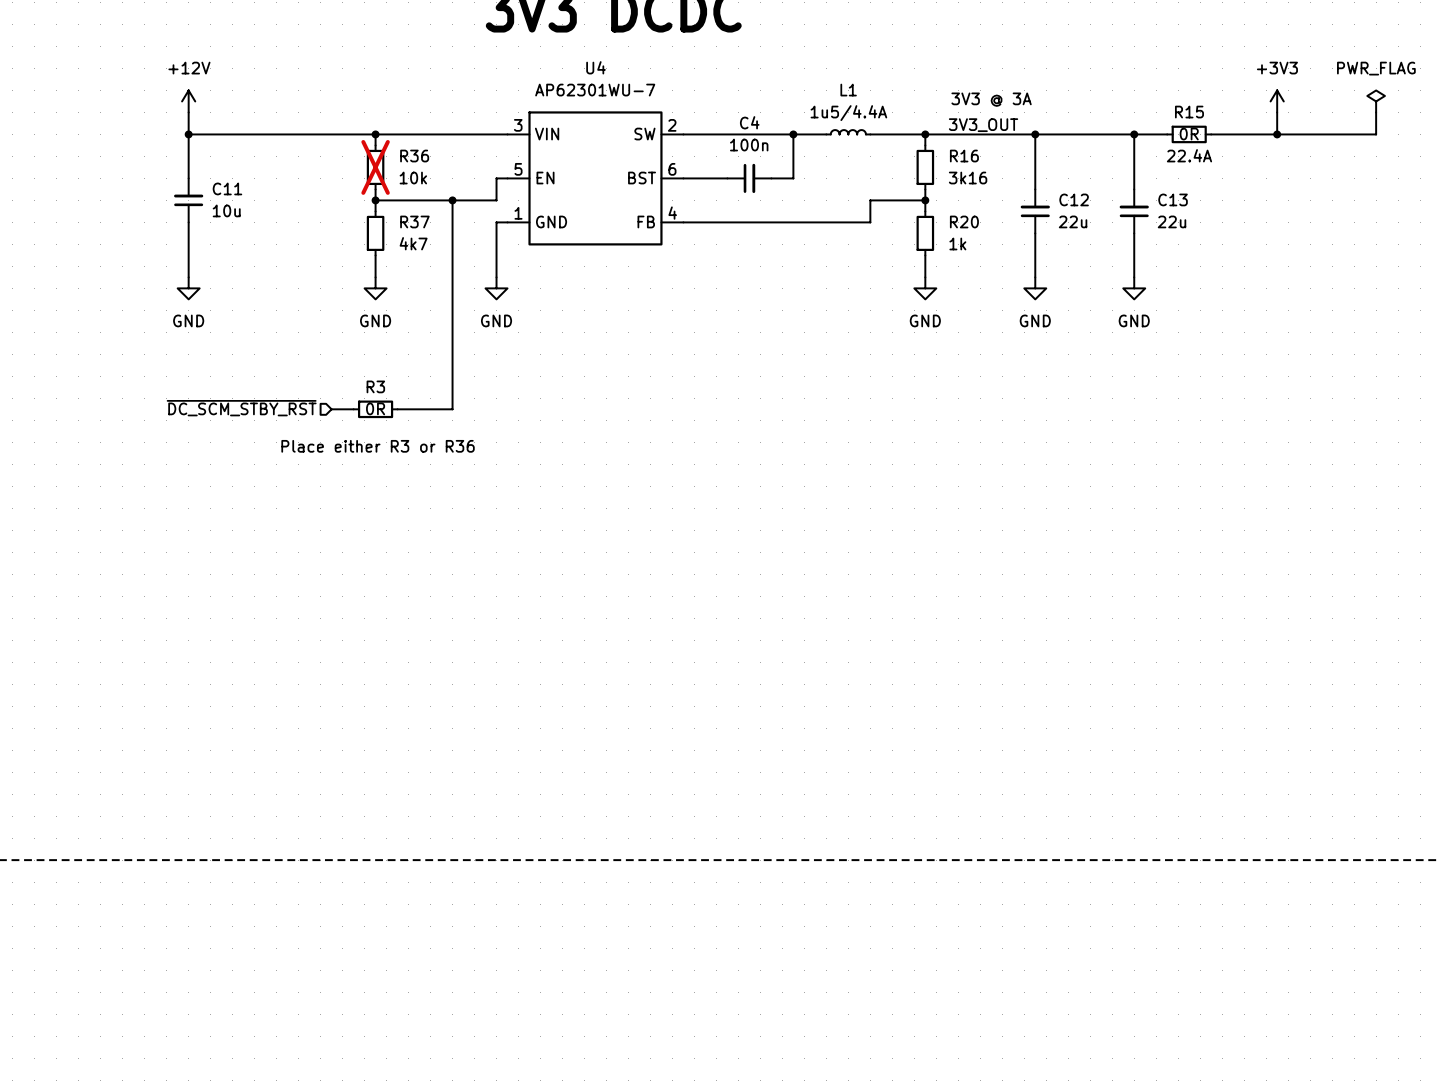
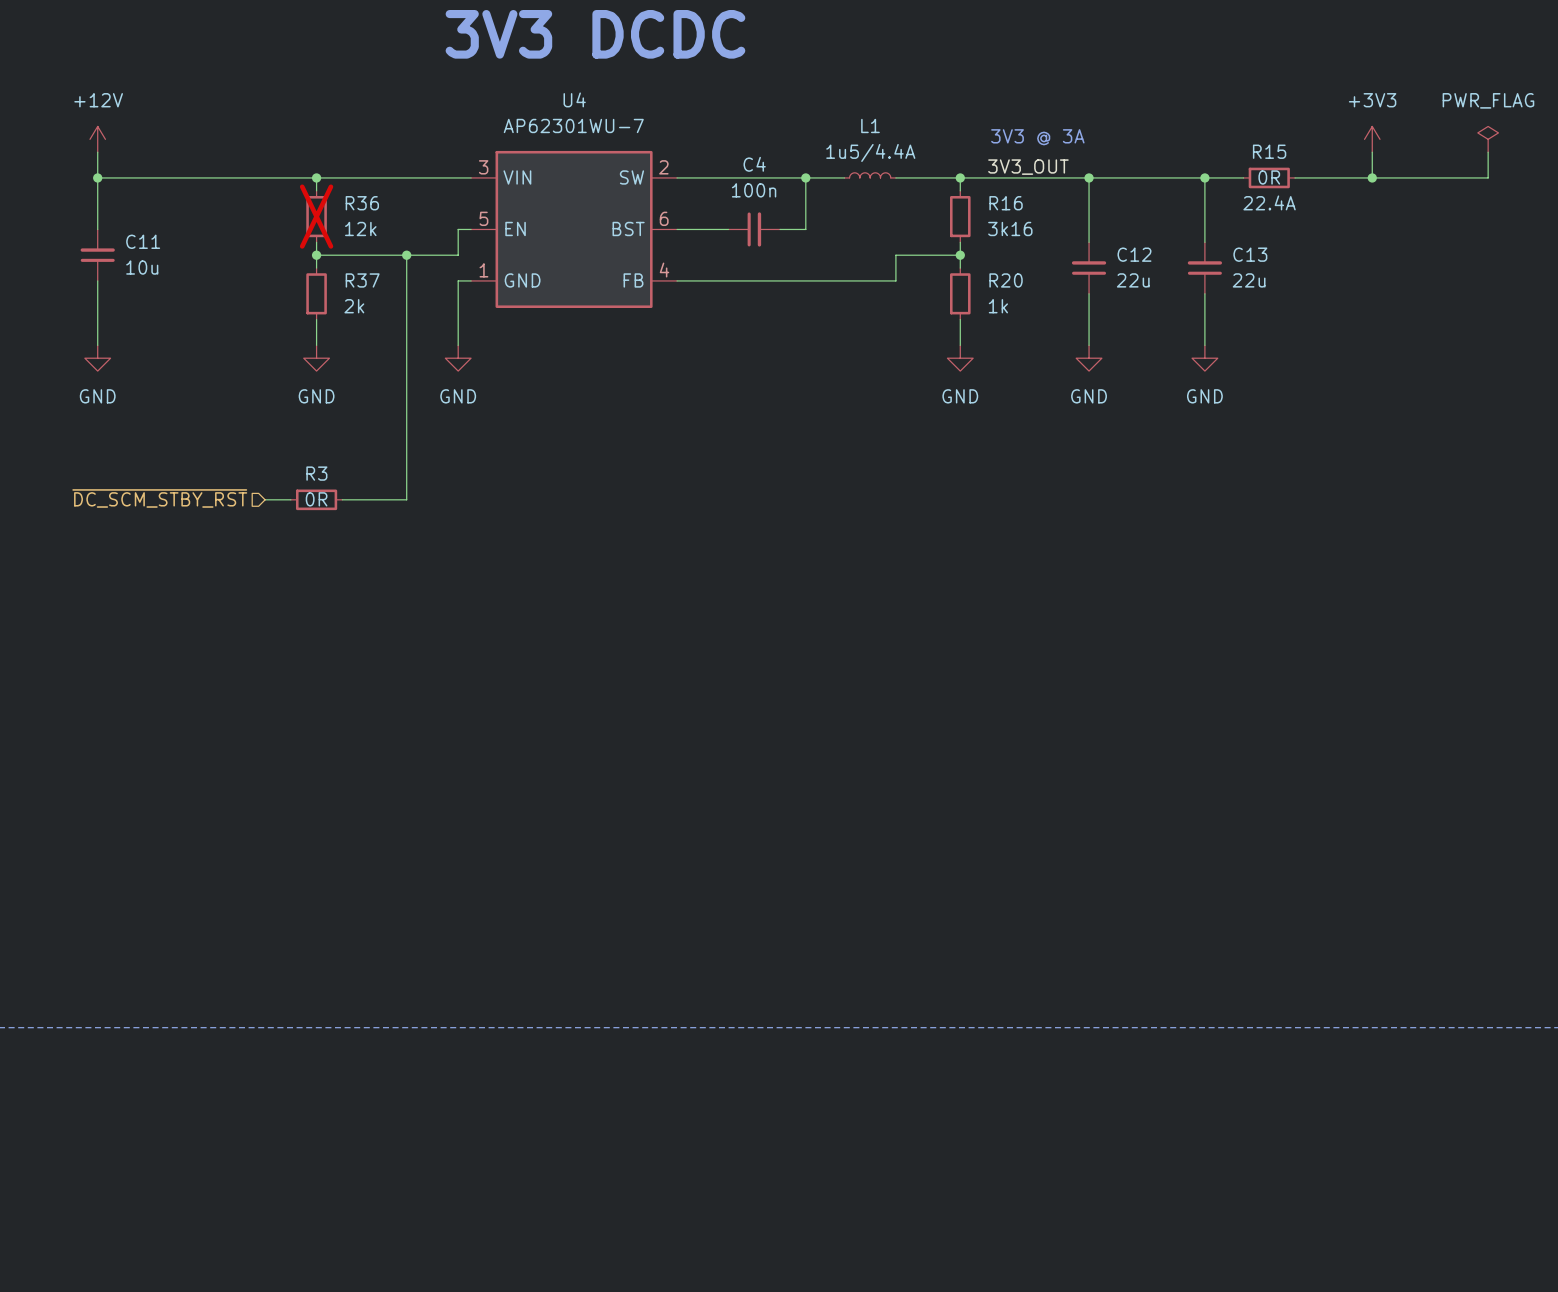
R36 text: 10k (413, 178) -> 12k (360, 228)
R37 text: 4k7 (413, 243) -> 2k (354, 306)
text: Place either R3 or R36 (378, 446) -> none

